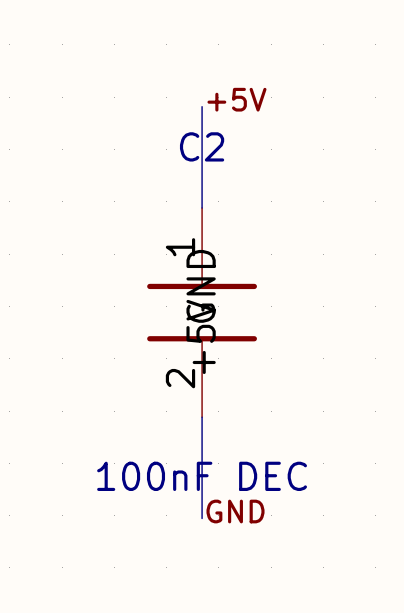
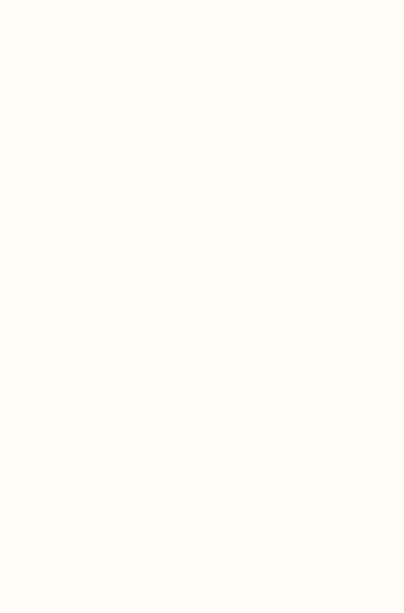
label: +5V (236, 99) -> none
wire: (202, 106) (202, 208) -> none
C2: 100nF DEC (202, 312) -> none
wire: (202, 417) (202, 518) -> none
label: GND (235, 511) -> none

